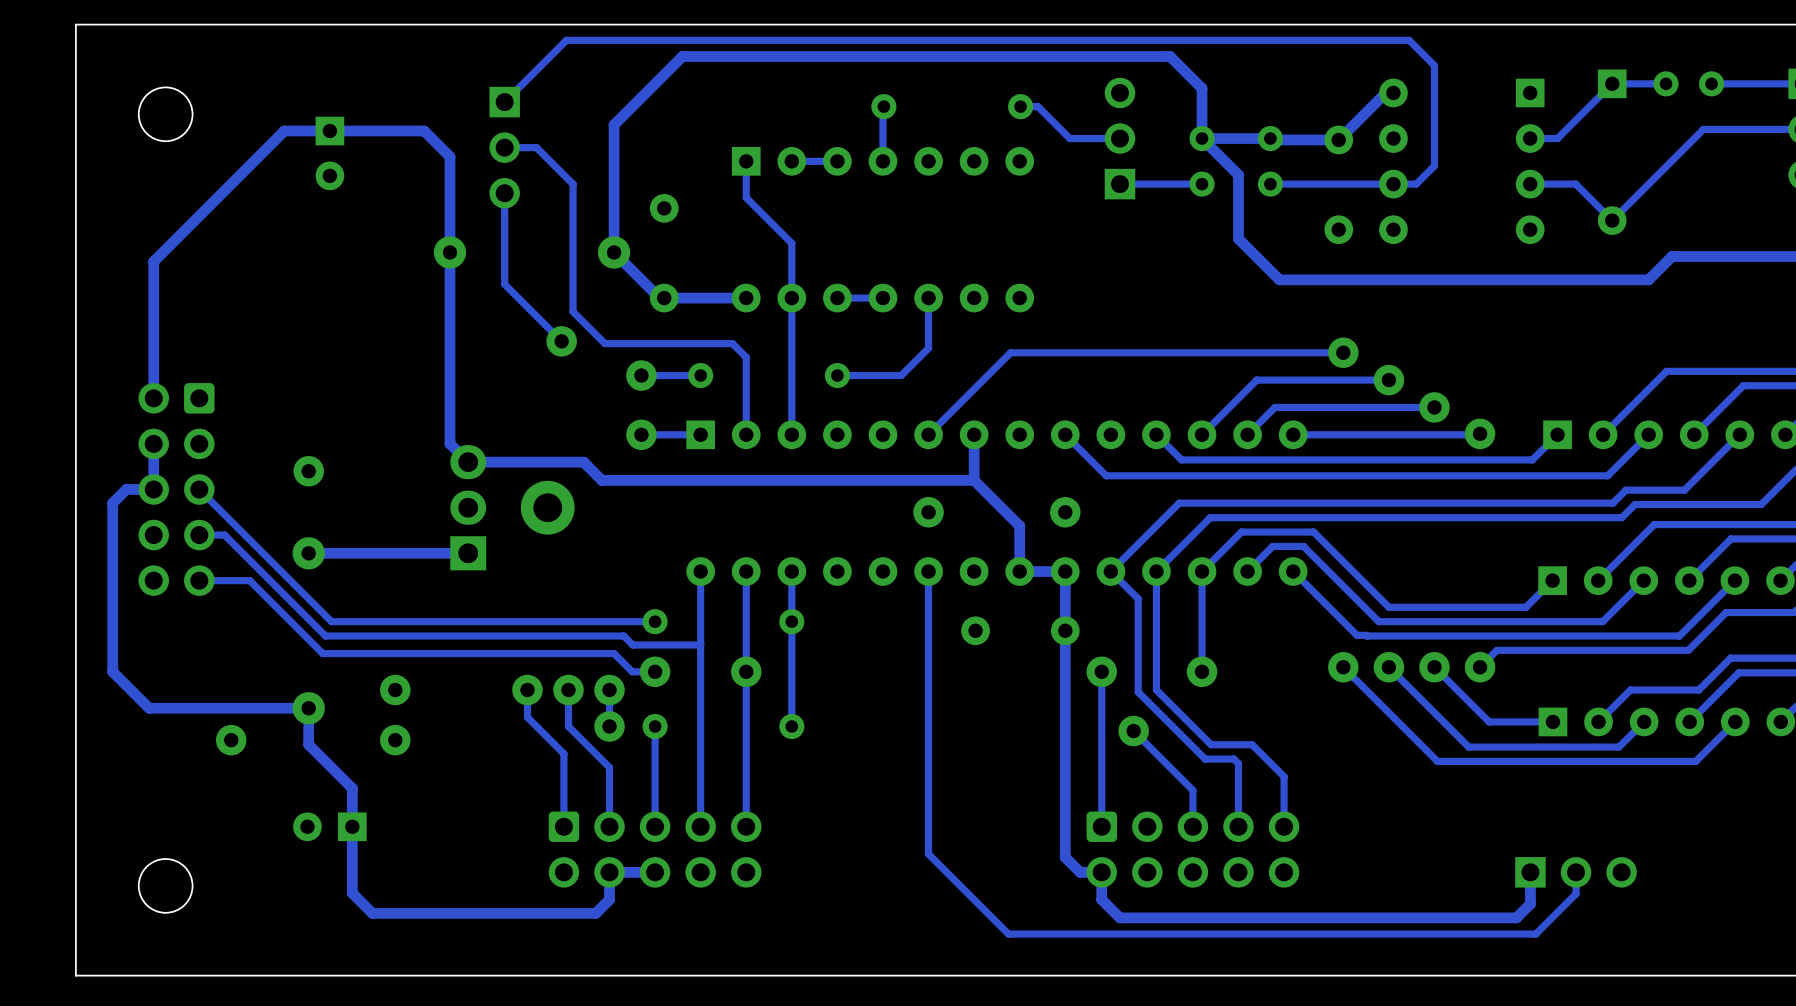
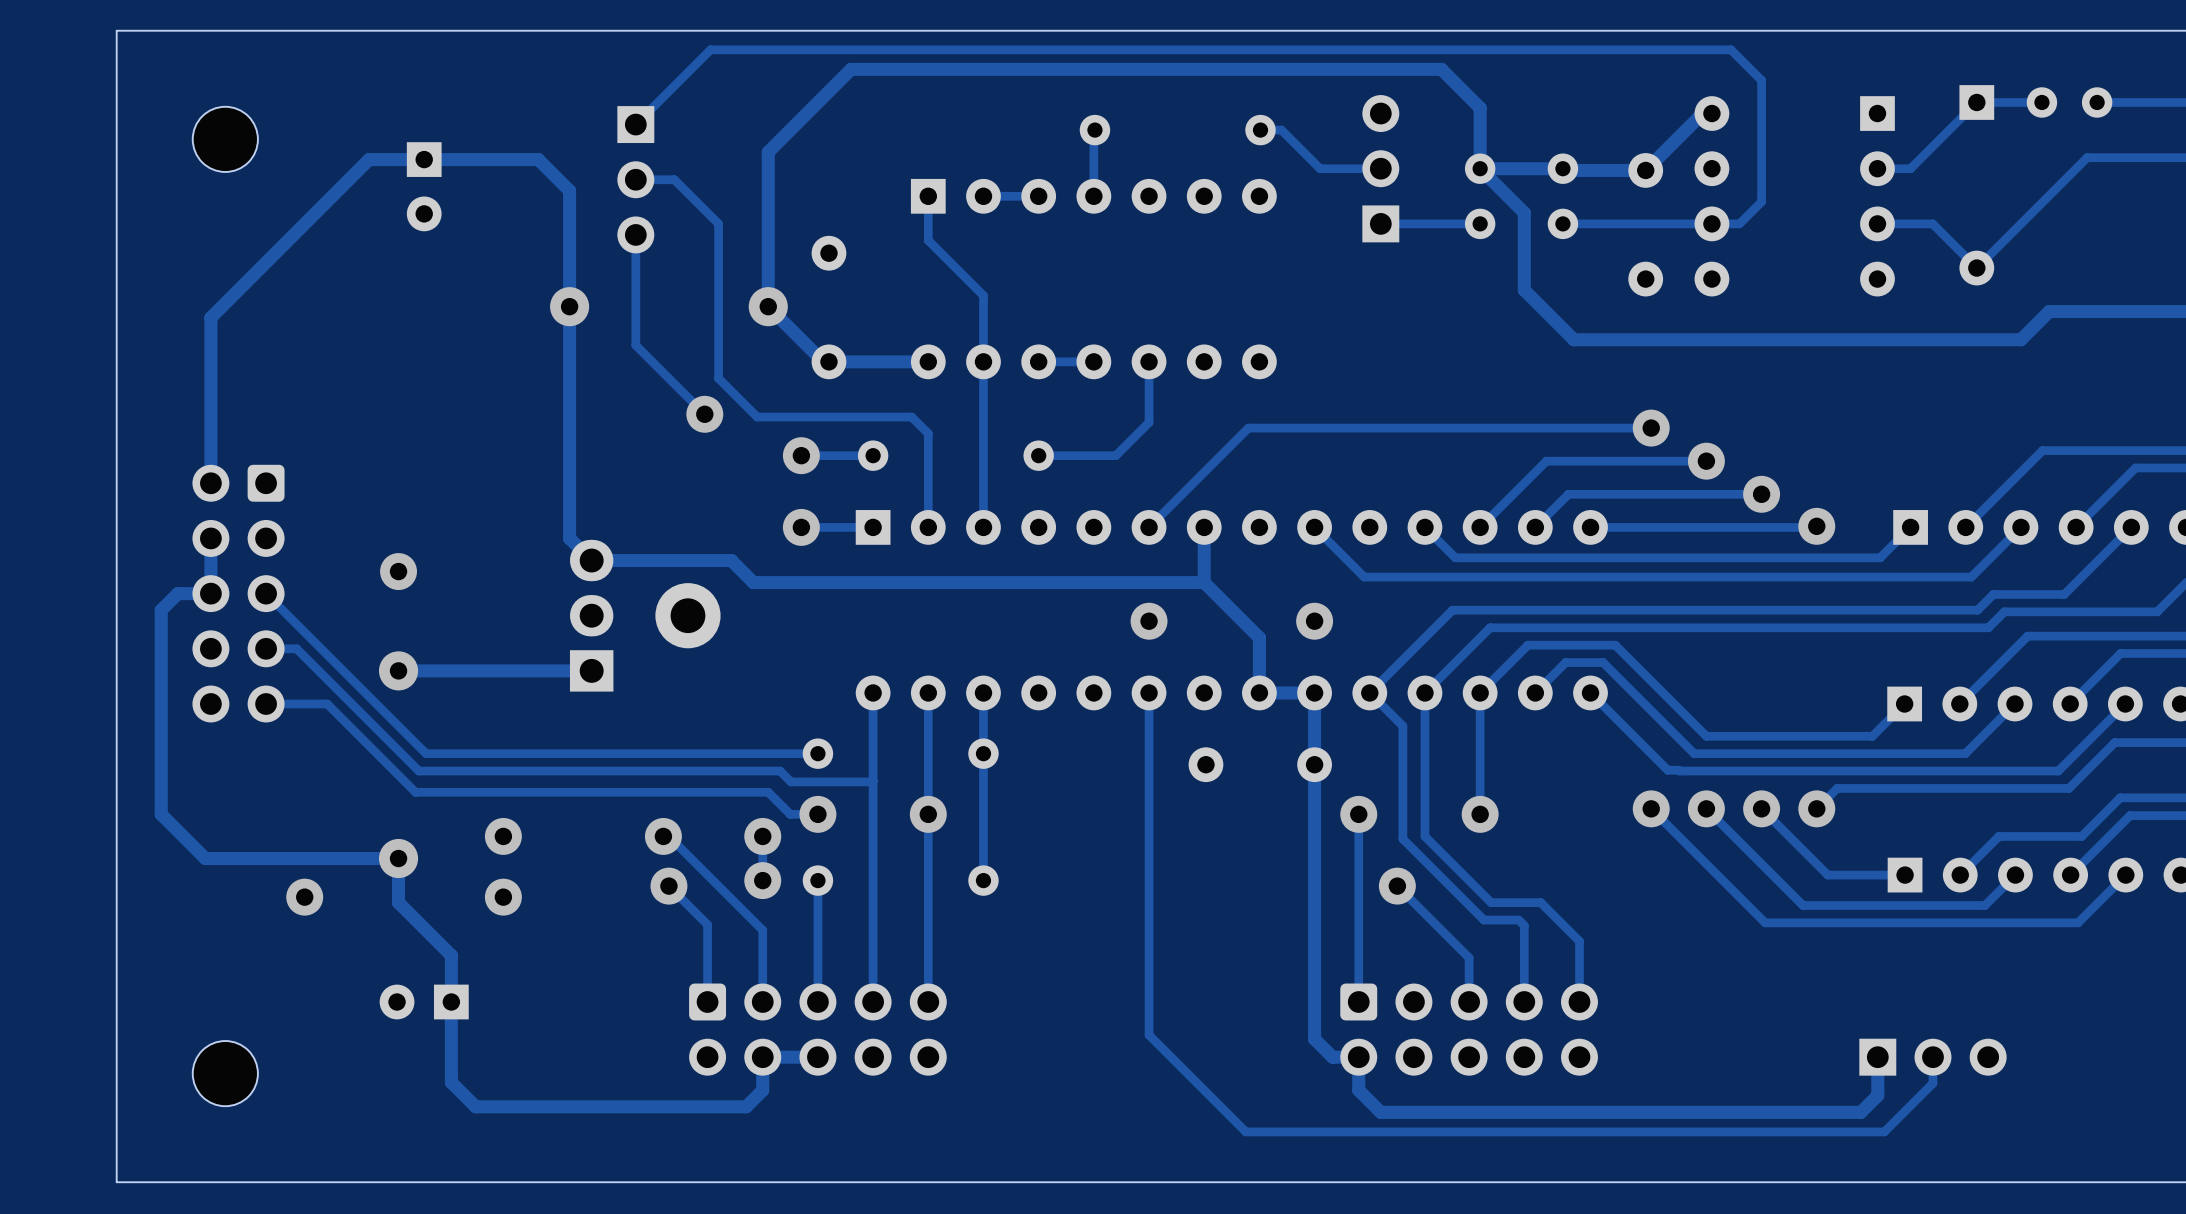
track: (527, 690) (527, 717) (563, 753) (563, 762) -> (668, 886) (707, 924)
track: (568, 690) (568, 726) -> (668, 836) (713, 880)
via position: (568, 690) -> (668, 886)

